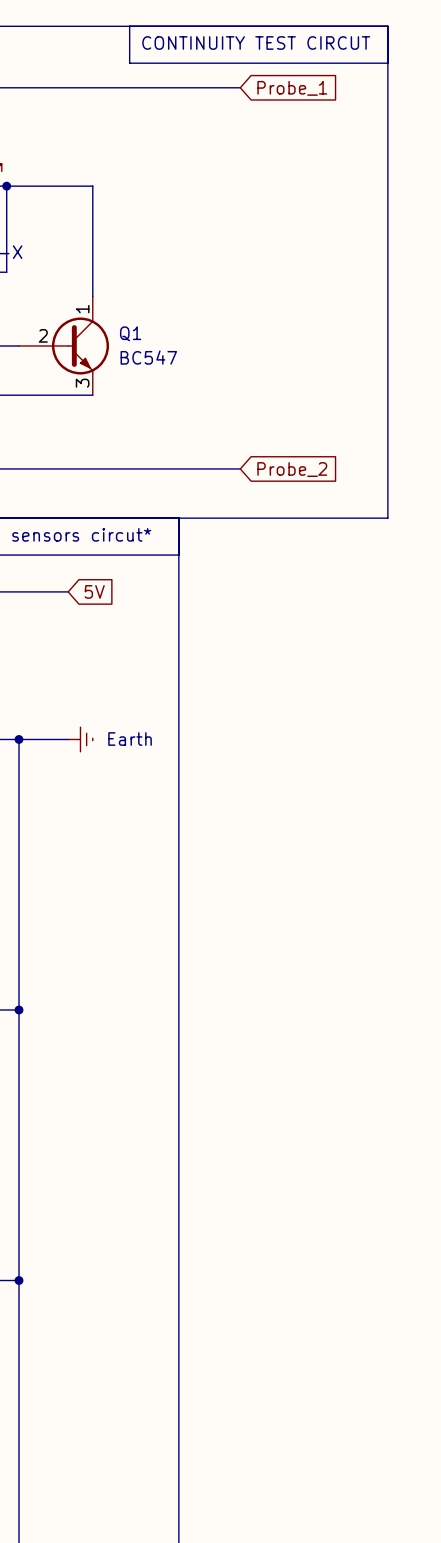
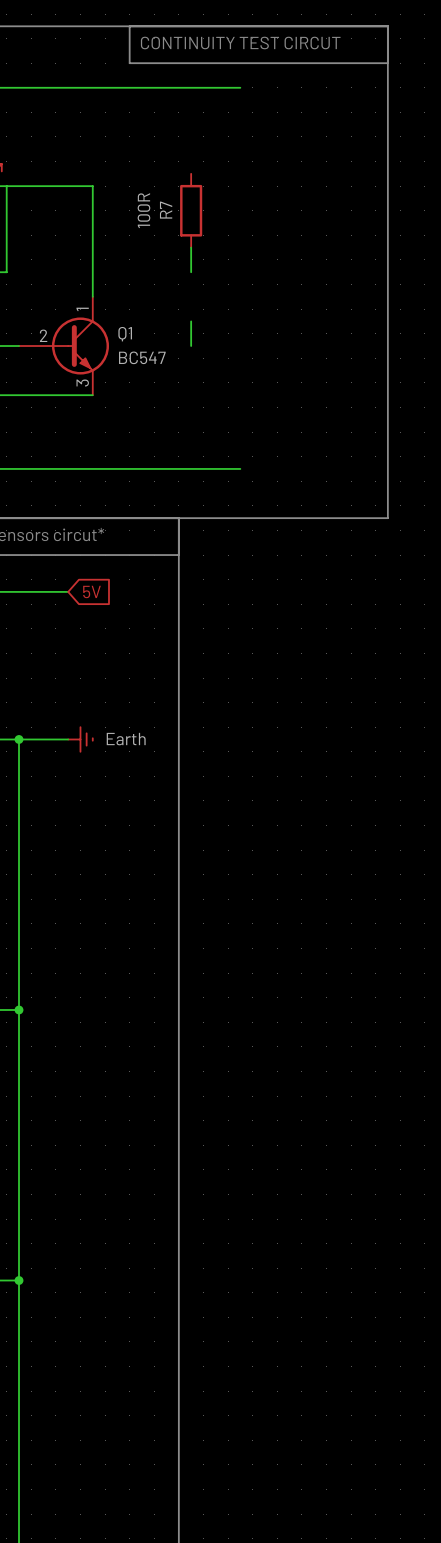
global label: Probe_1 (292, 88) -> none
junction: (6, 186) -> none
R7: none -> 100R (191, 210)
wire: none -> (191, 247) (191, 272)
wire: none -> (191, 321) (191, 346)
global label: Probe_2 (292, 469) -> none

